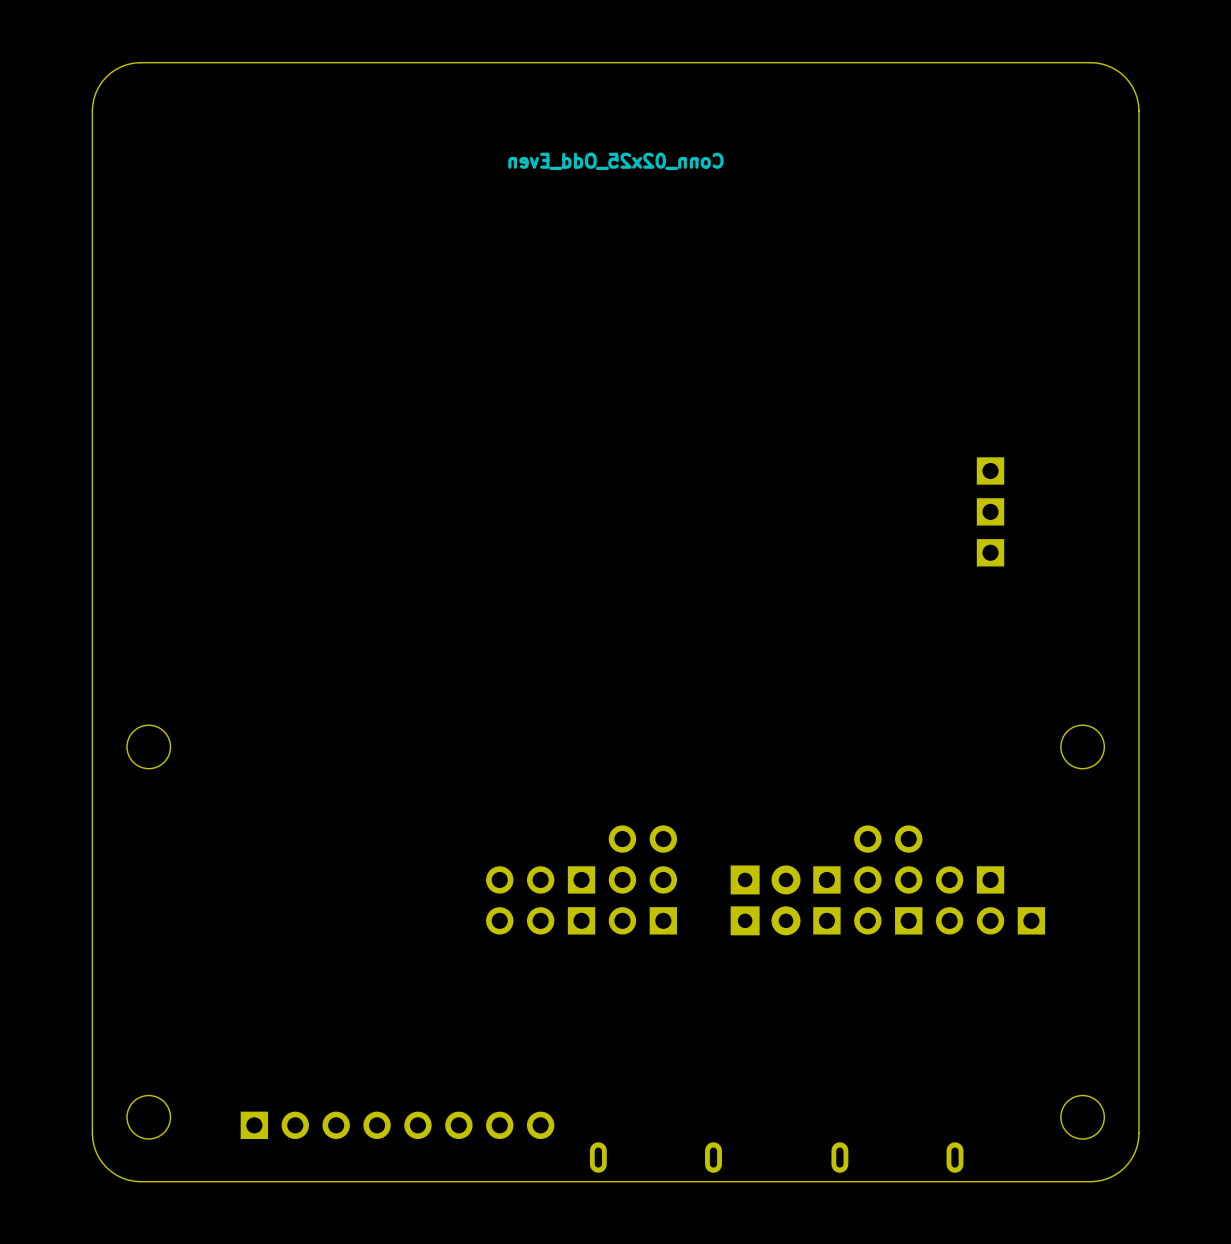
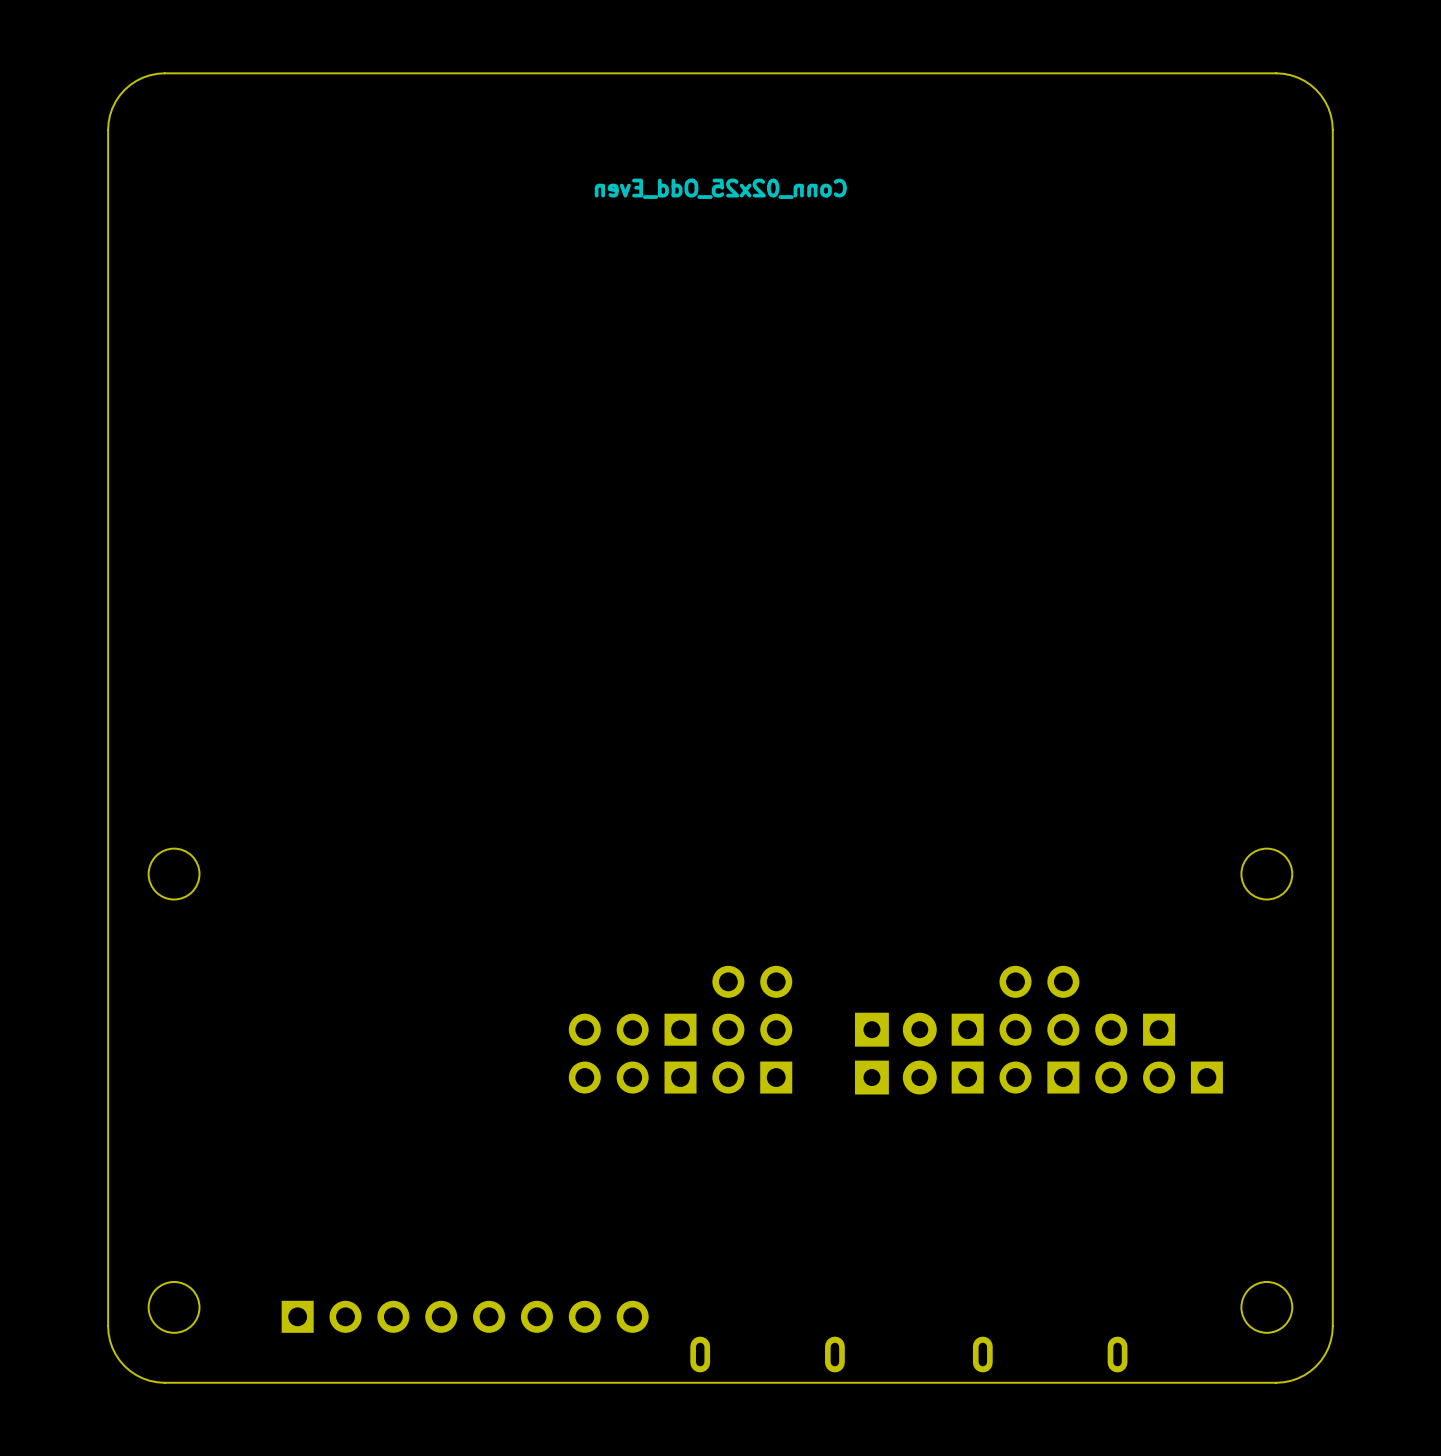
part: (990, 470) -> none
part: (990, 511) -> none
part: (990, 552) -> none

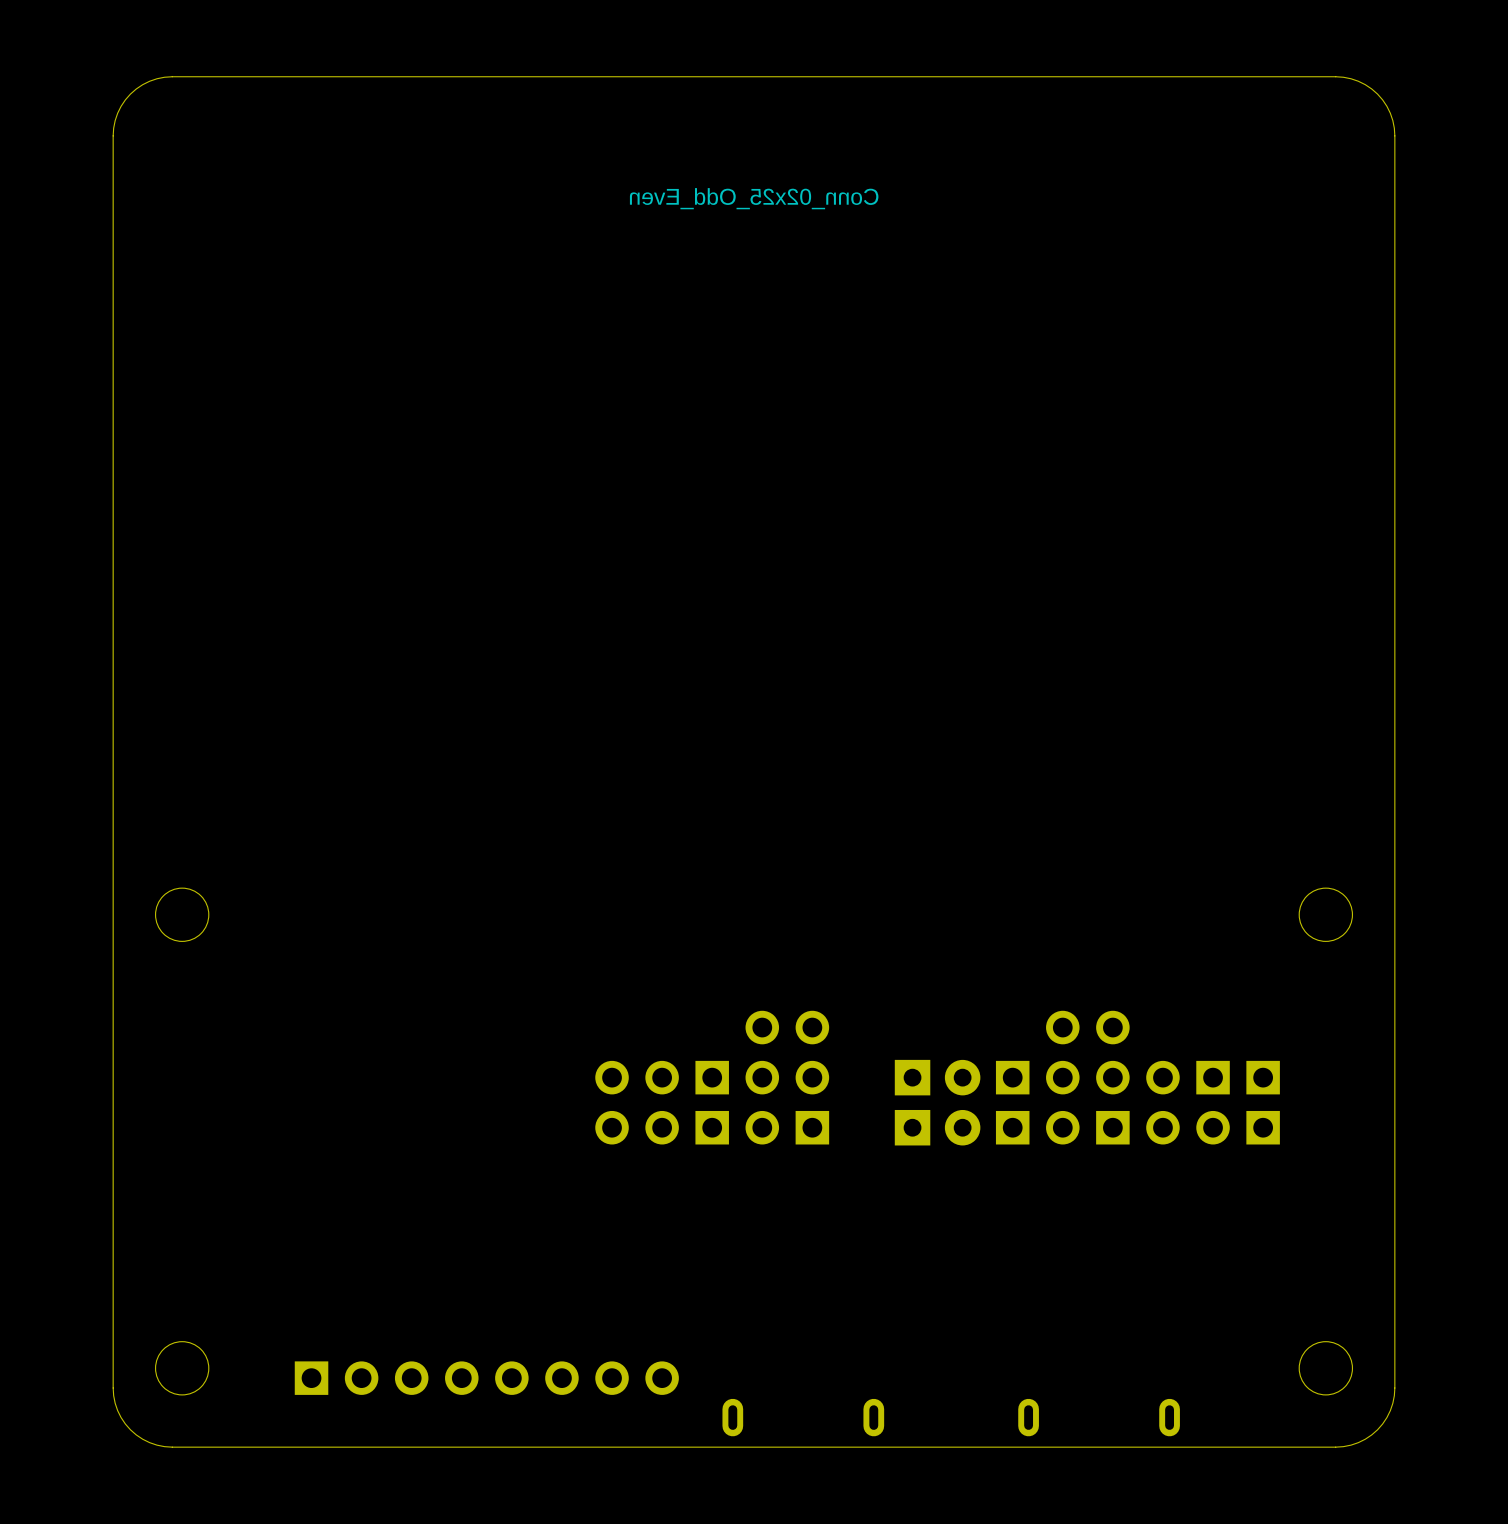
part: none -> (1263, 1077)

